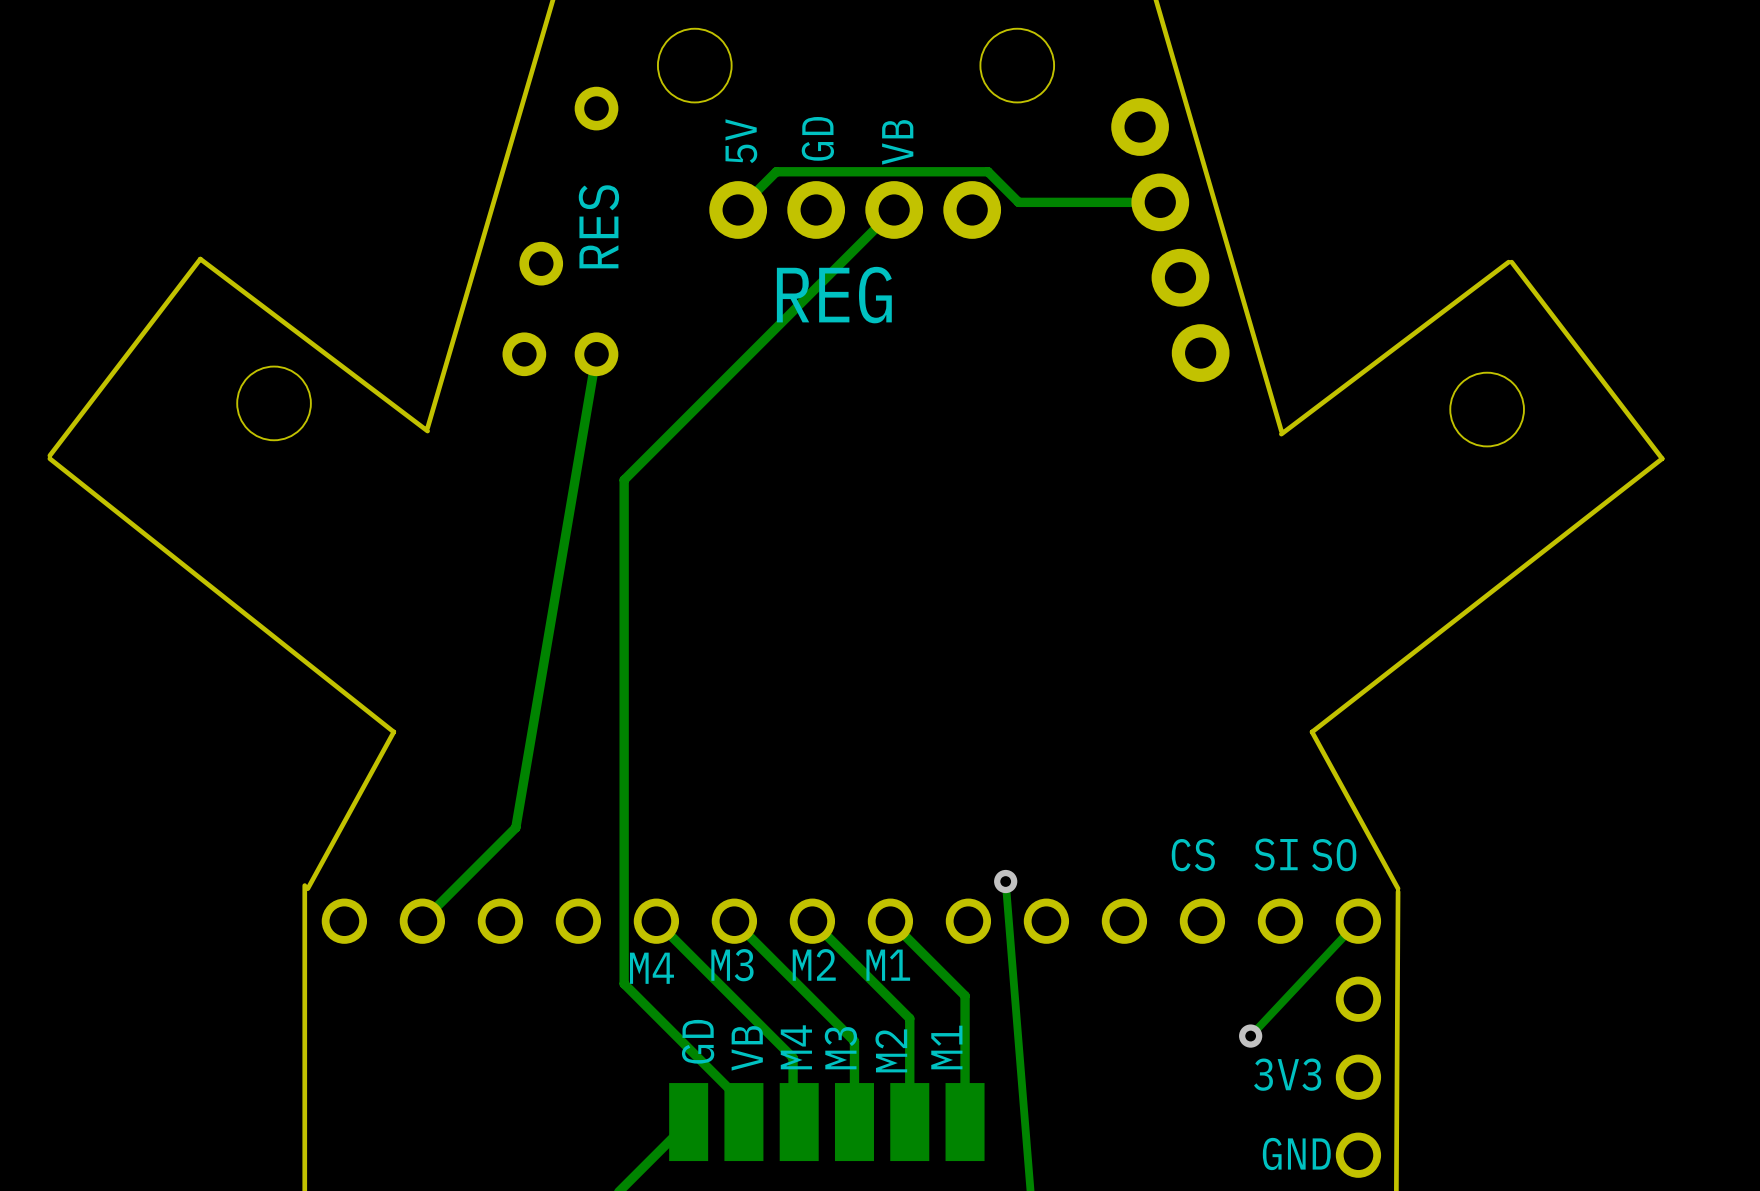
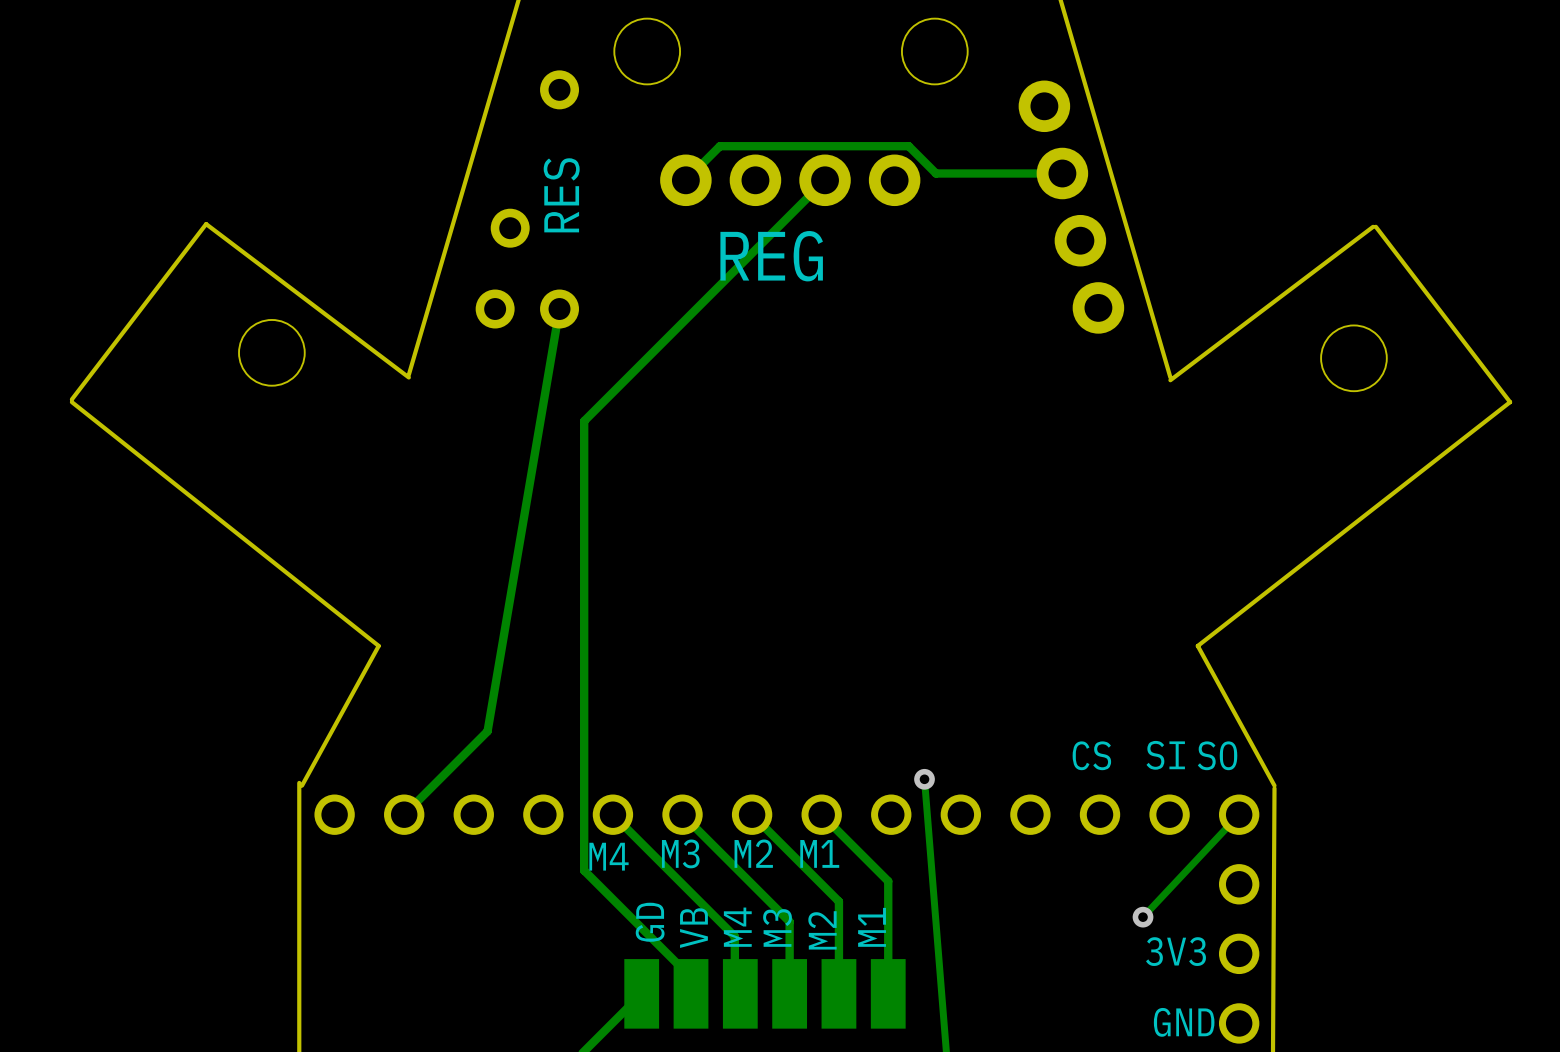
text: GD (817, 138) -> none
text: 5V (741, 141) -> none
text: VB (897, 142) -> none

